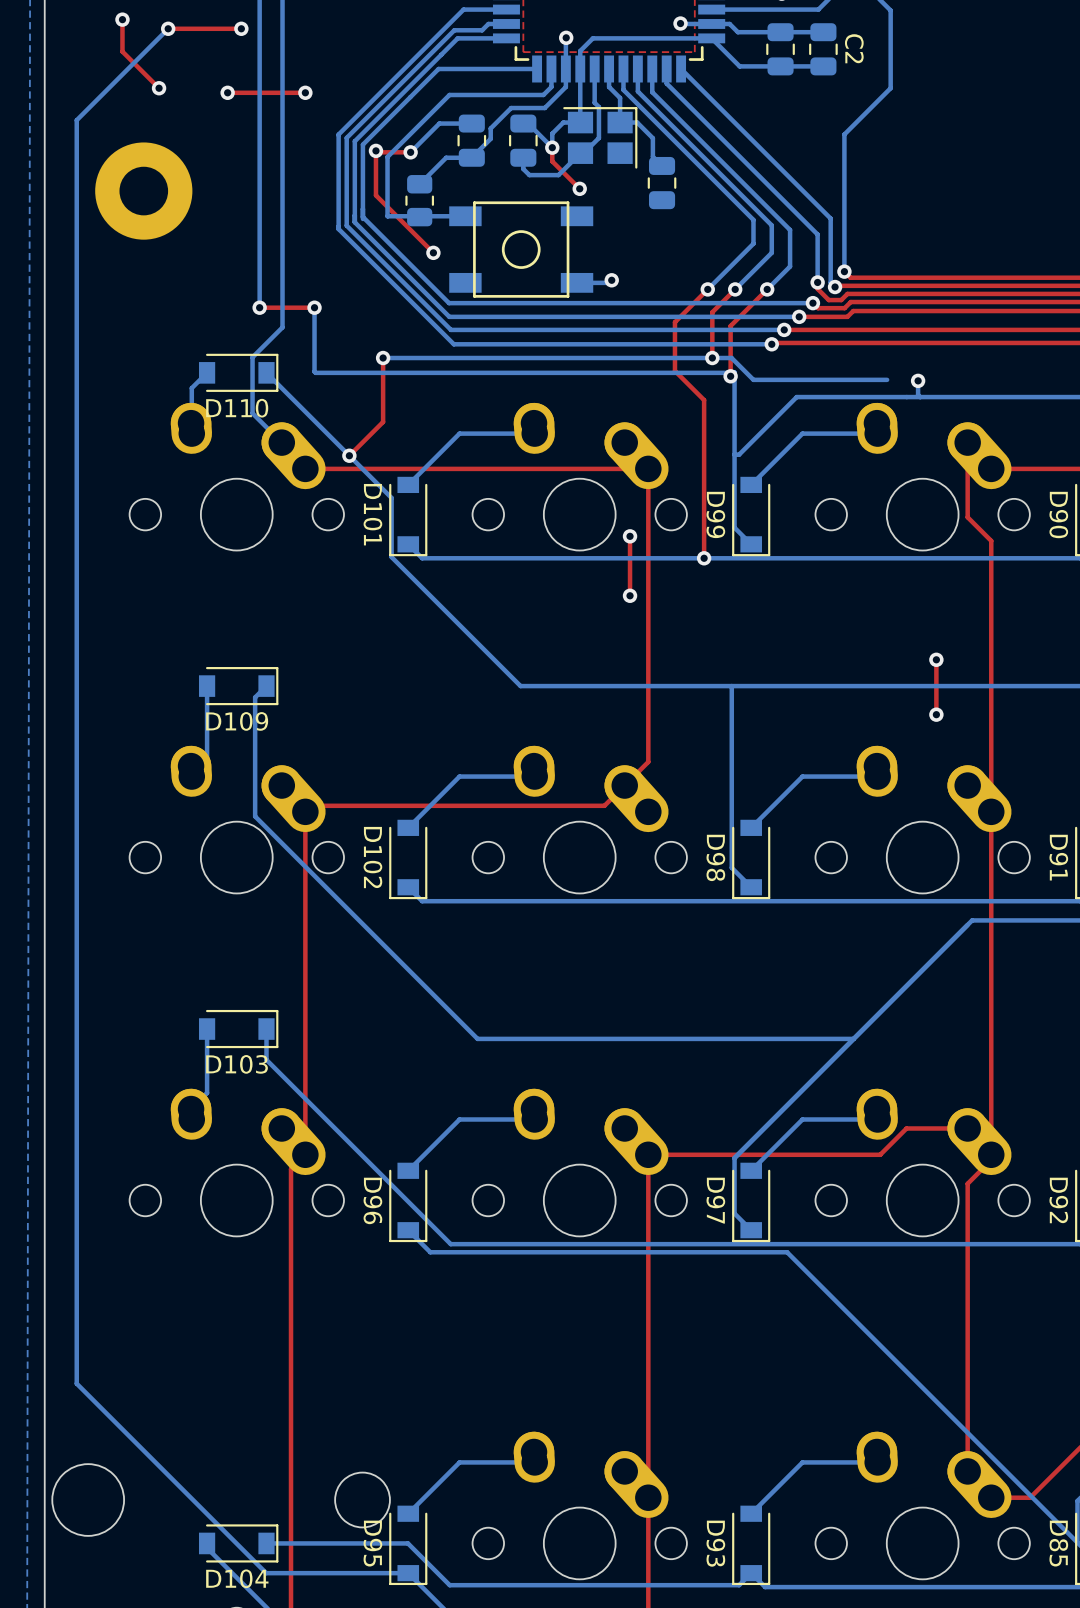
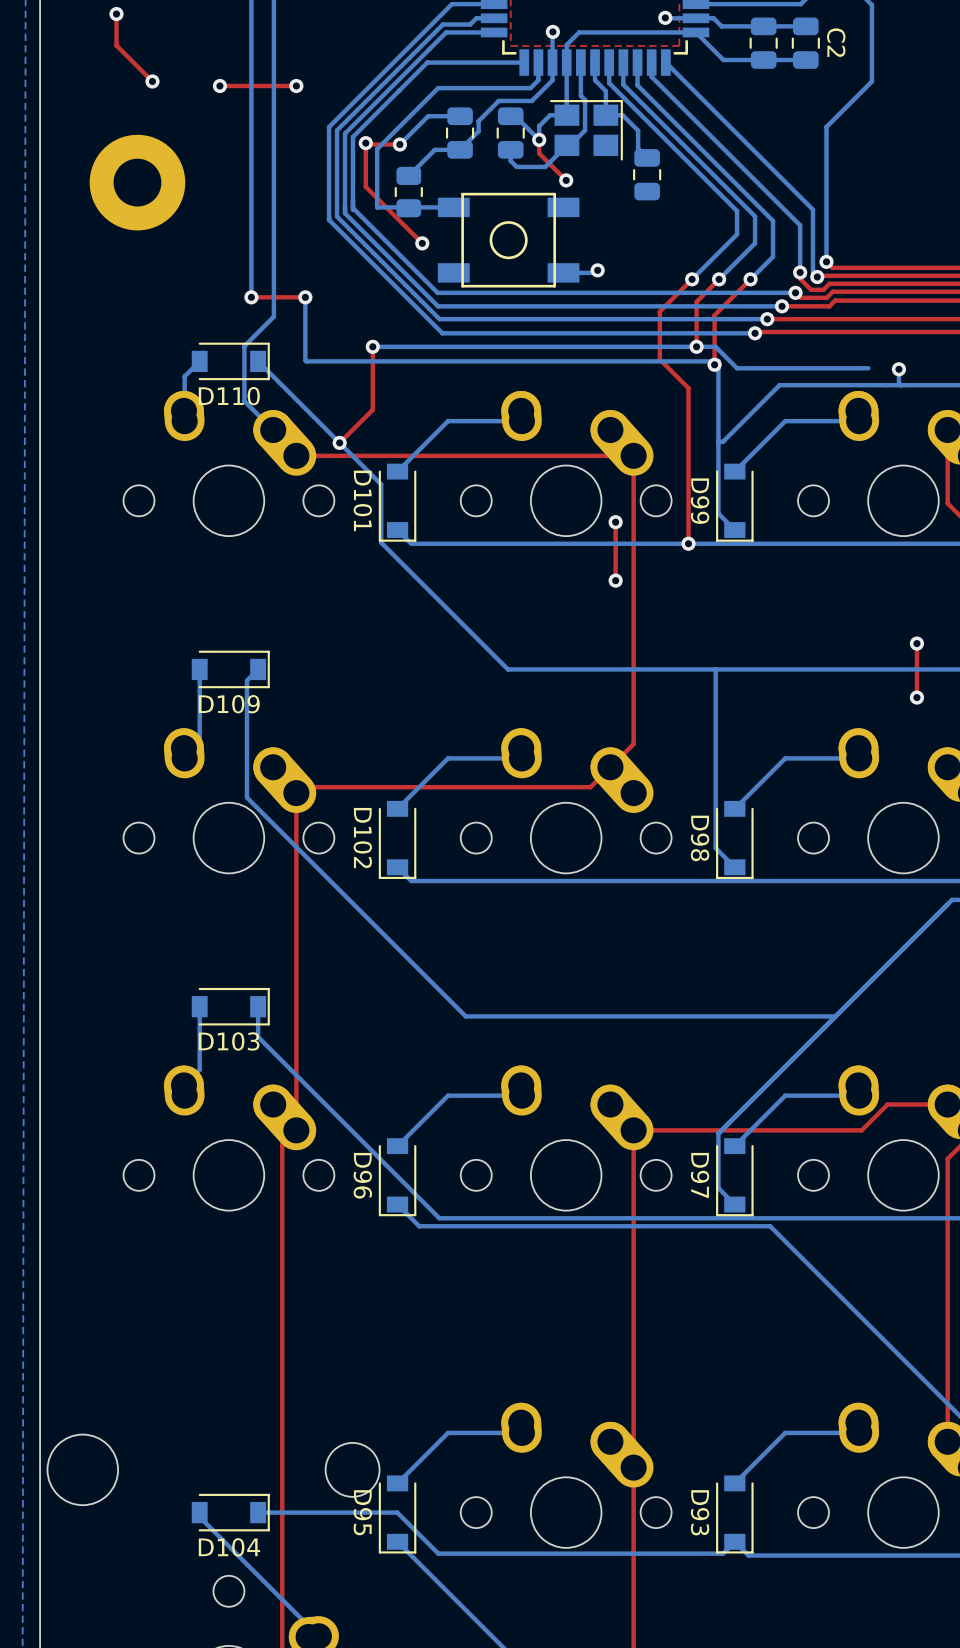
bottom track: (168, 28) (76, 120) (76, 1383) (266, 1573) (408, 1573) -> none
via: (168, 28) -> none
top track: (241, 28) (168, 28) -> none
via: (241, 28) -> none

